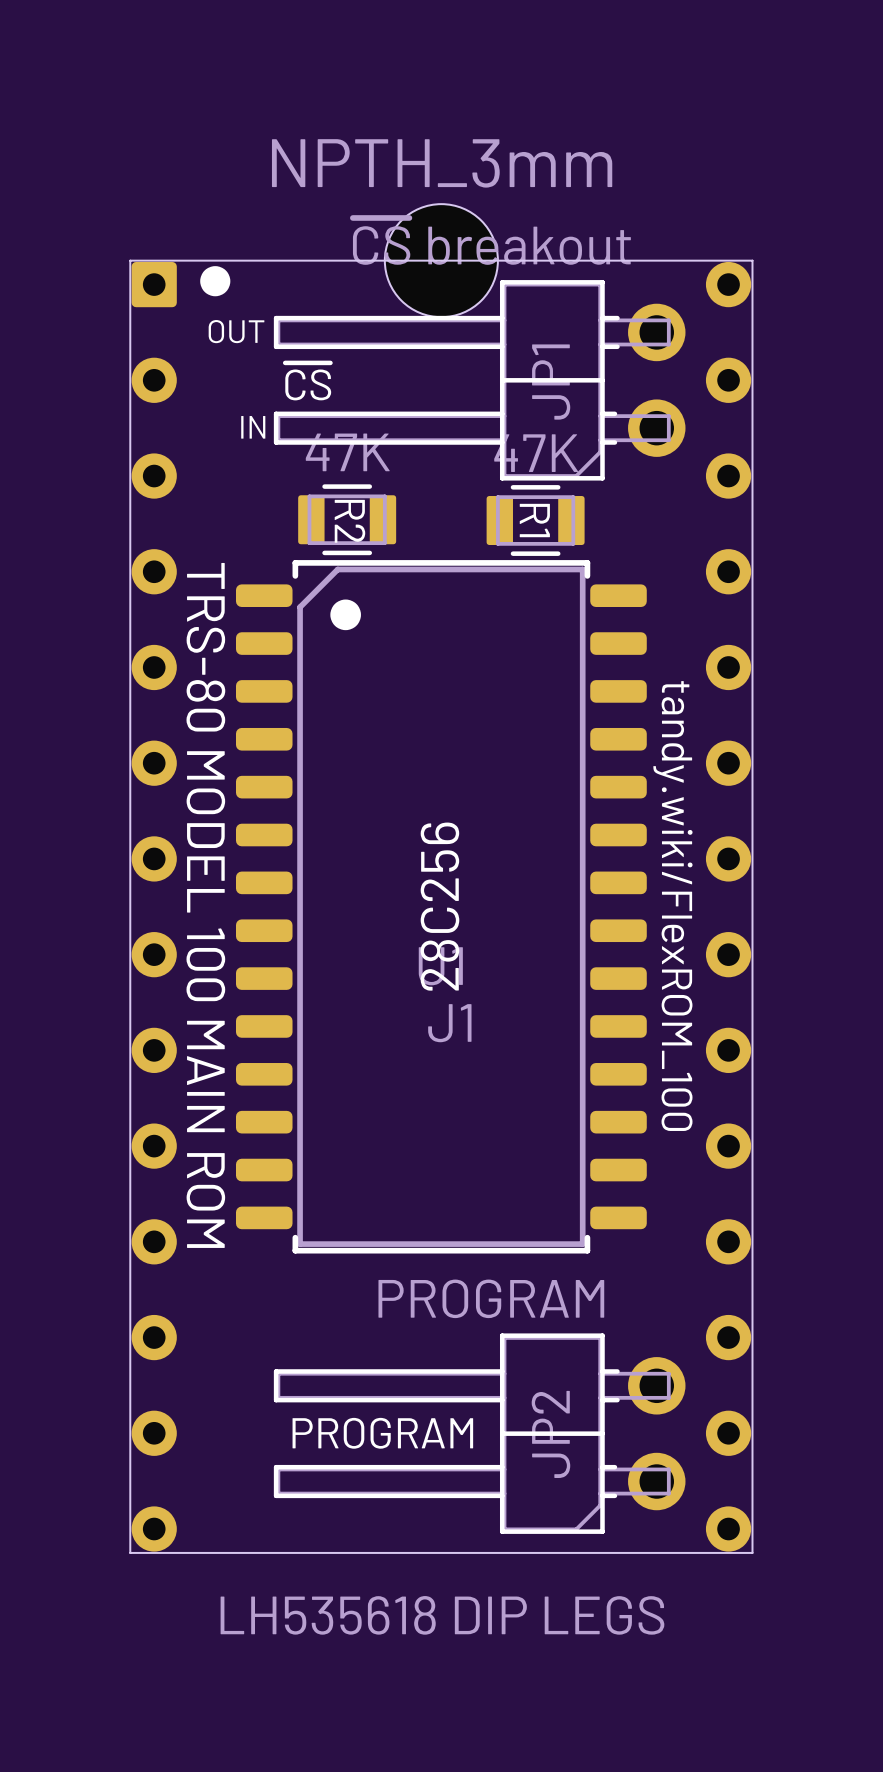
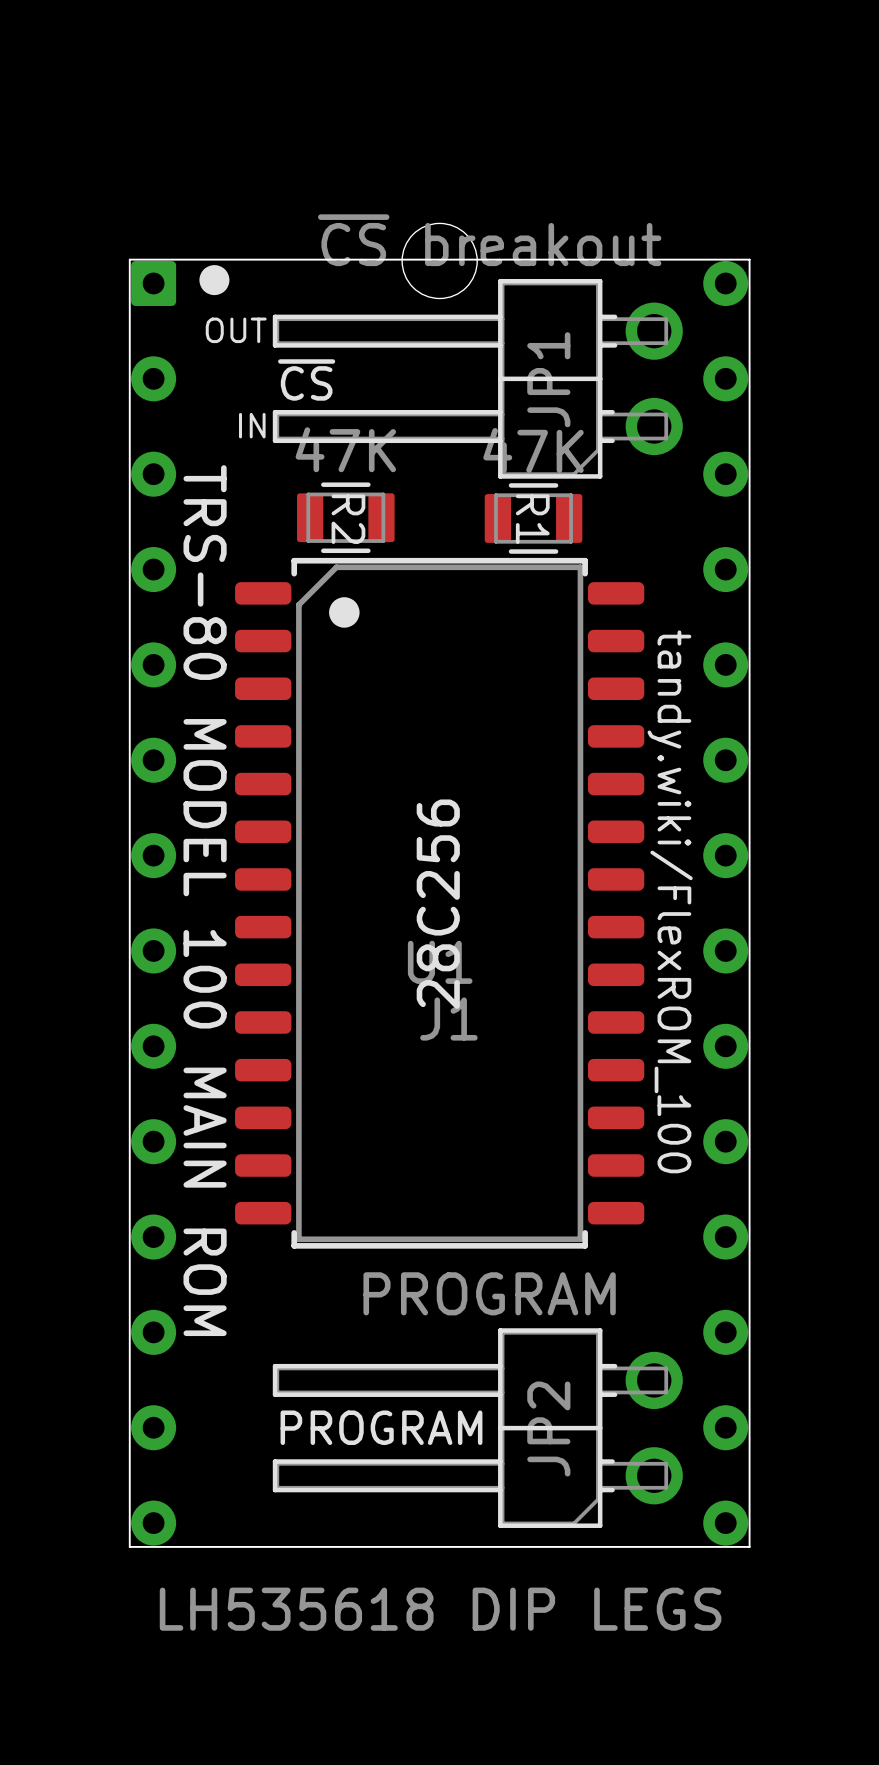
part: NPTH_3mm (441, 260) -> none
J1 footprint: [131, 261, 752, 1552] -> [131, 223, 749, 1546]

